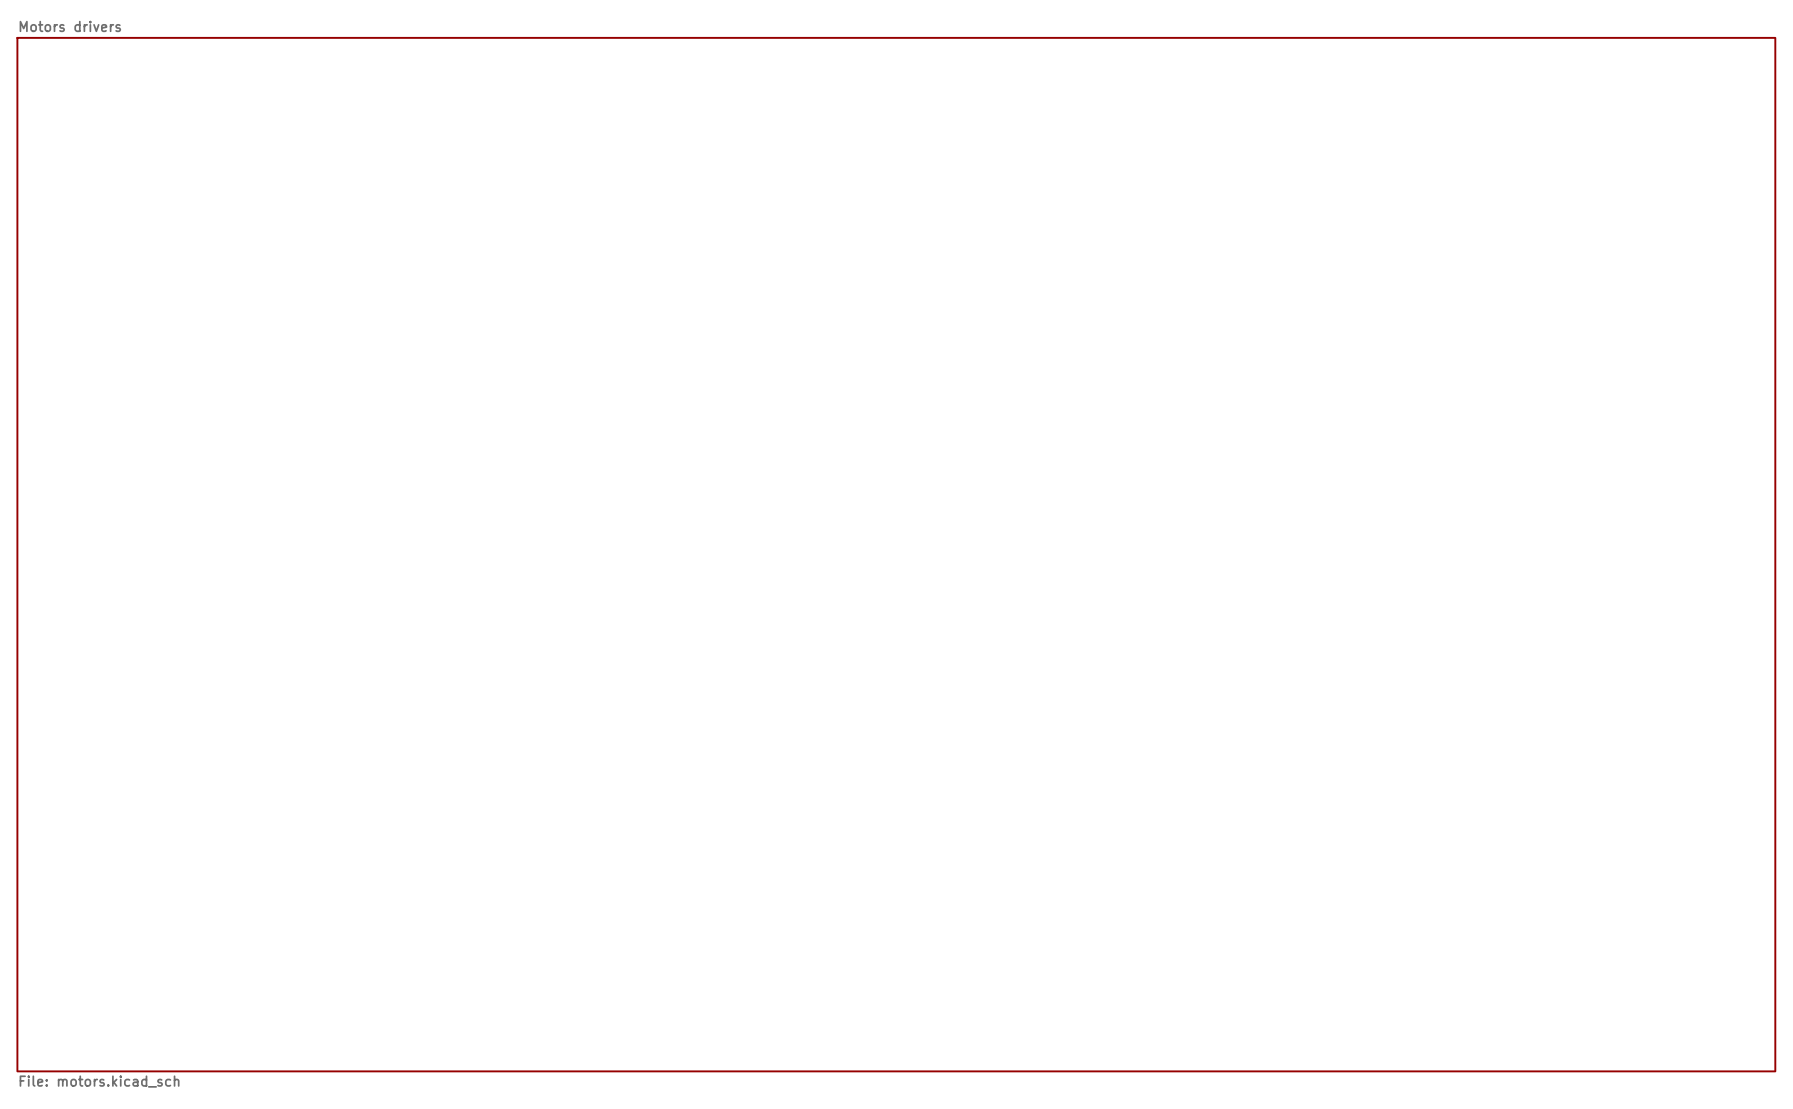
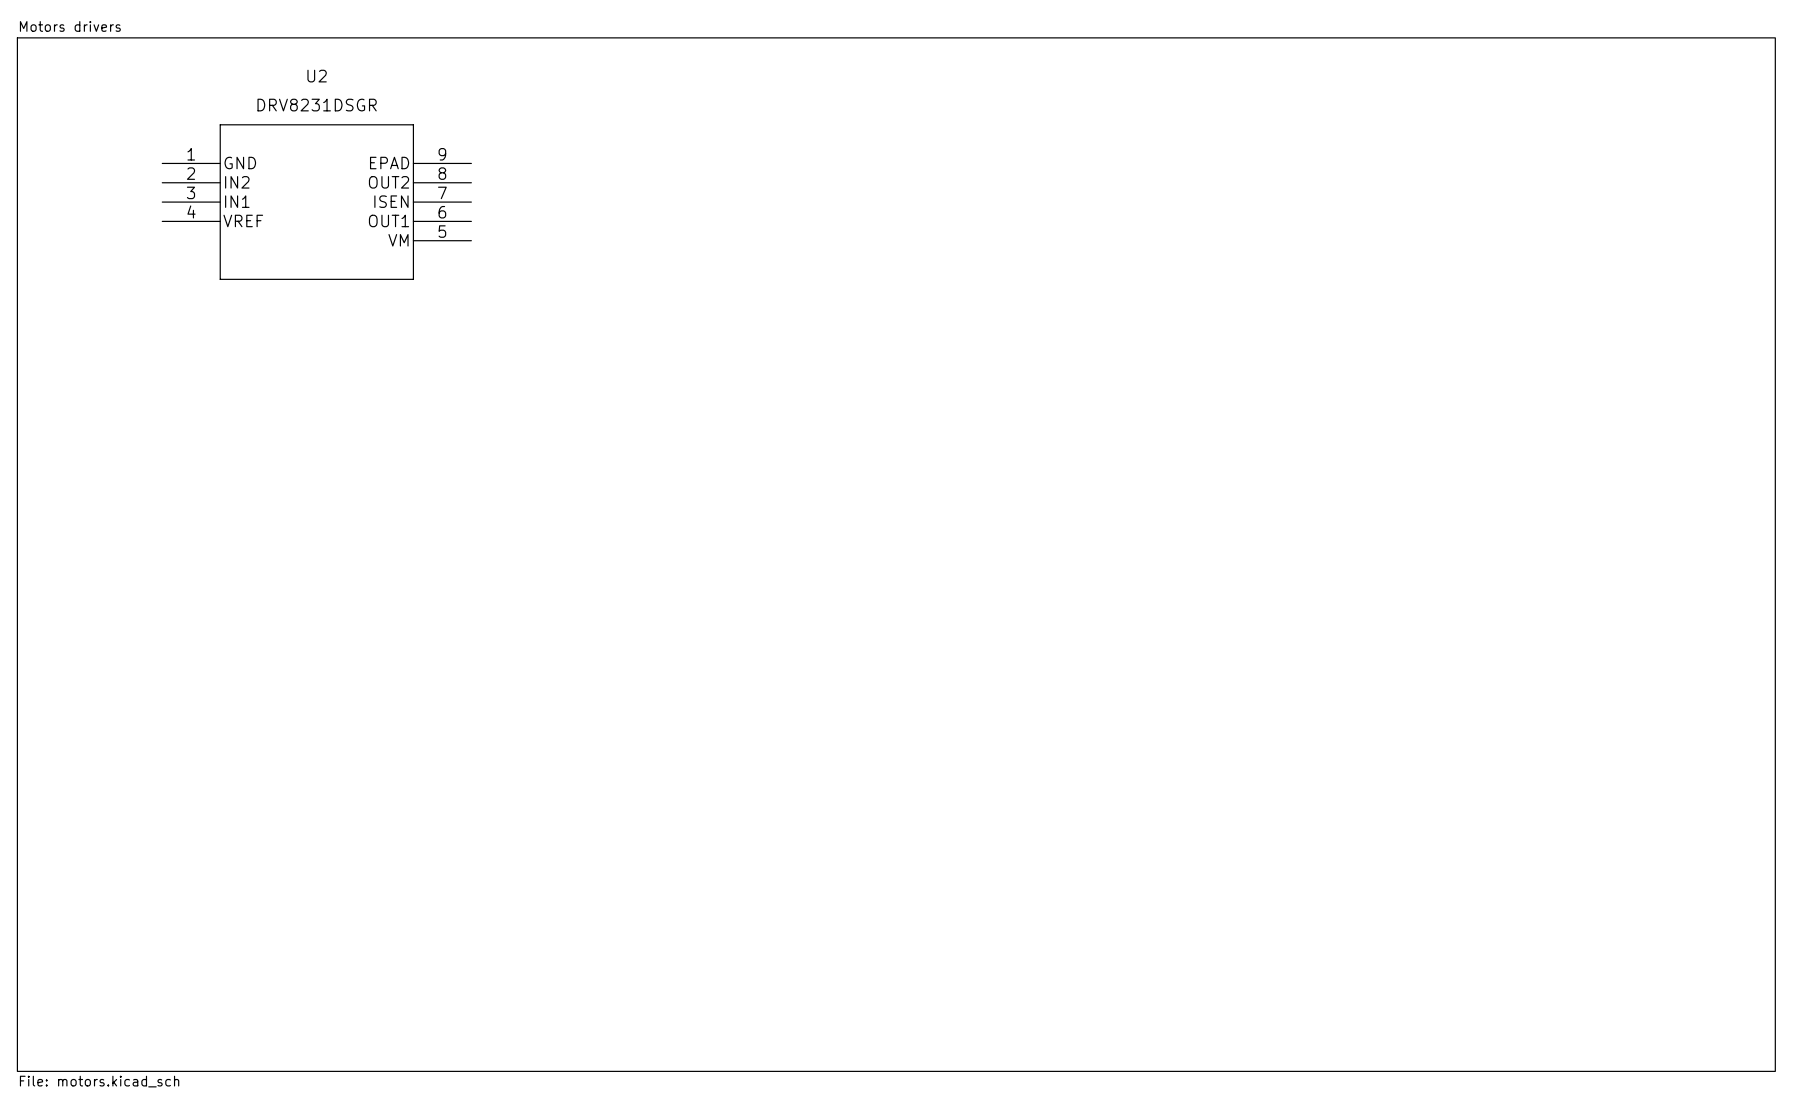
U2: none -> DRV8231DSGR (316, 202)

